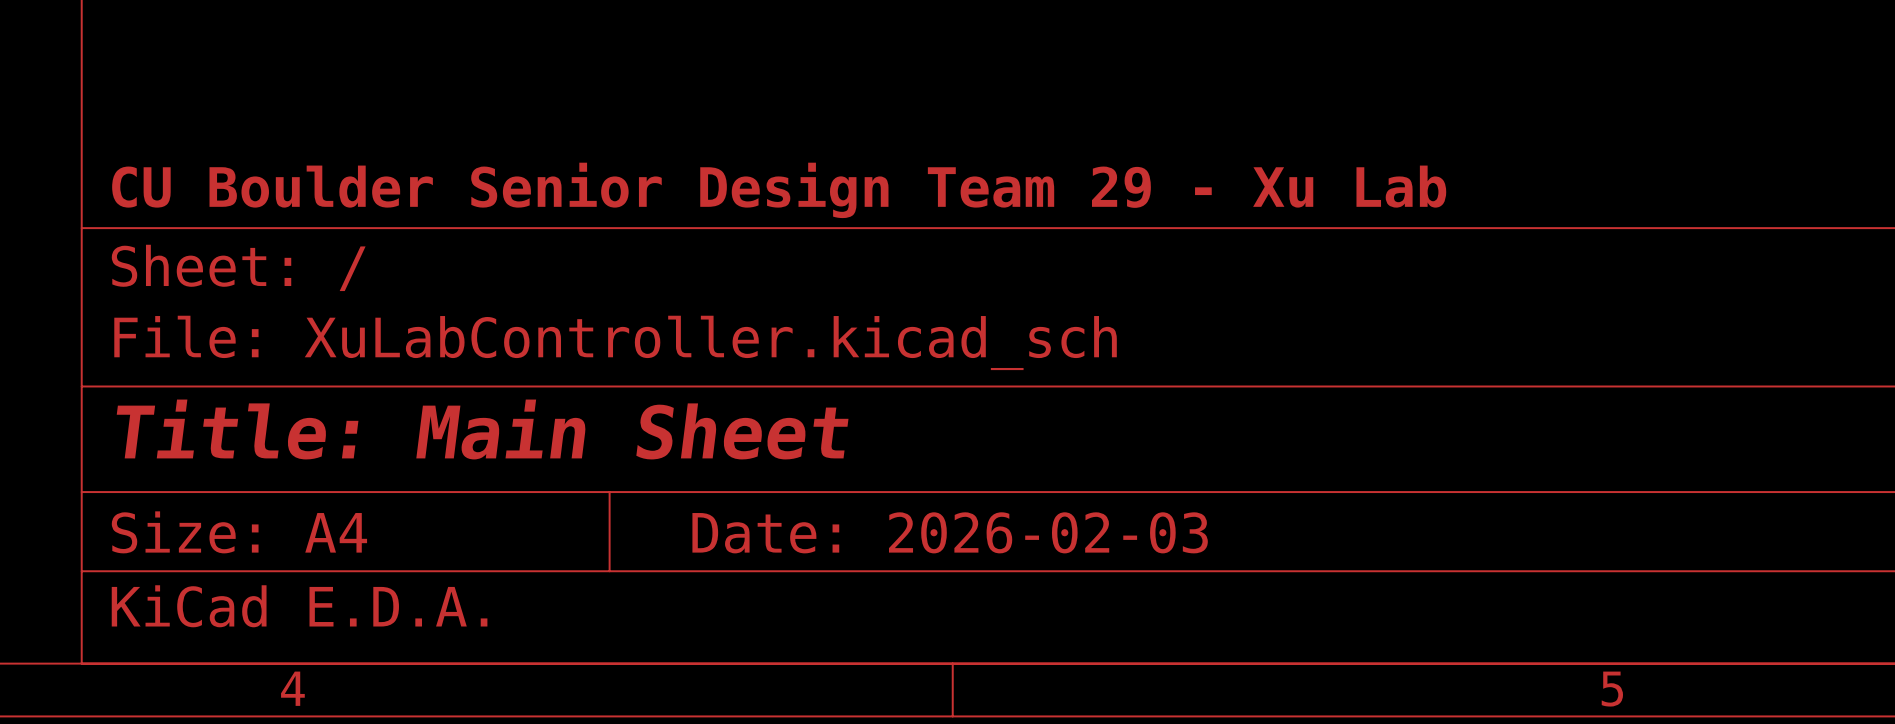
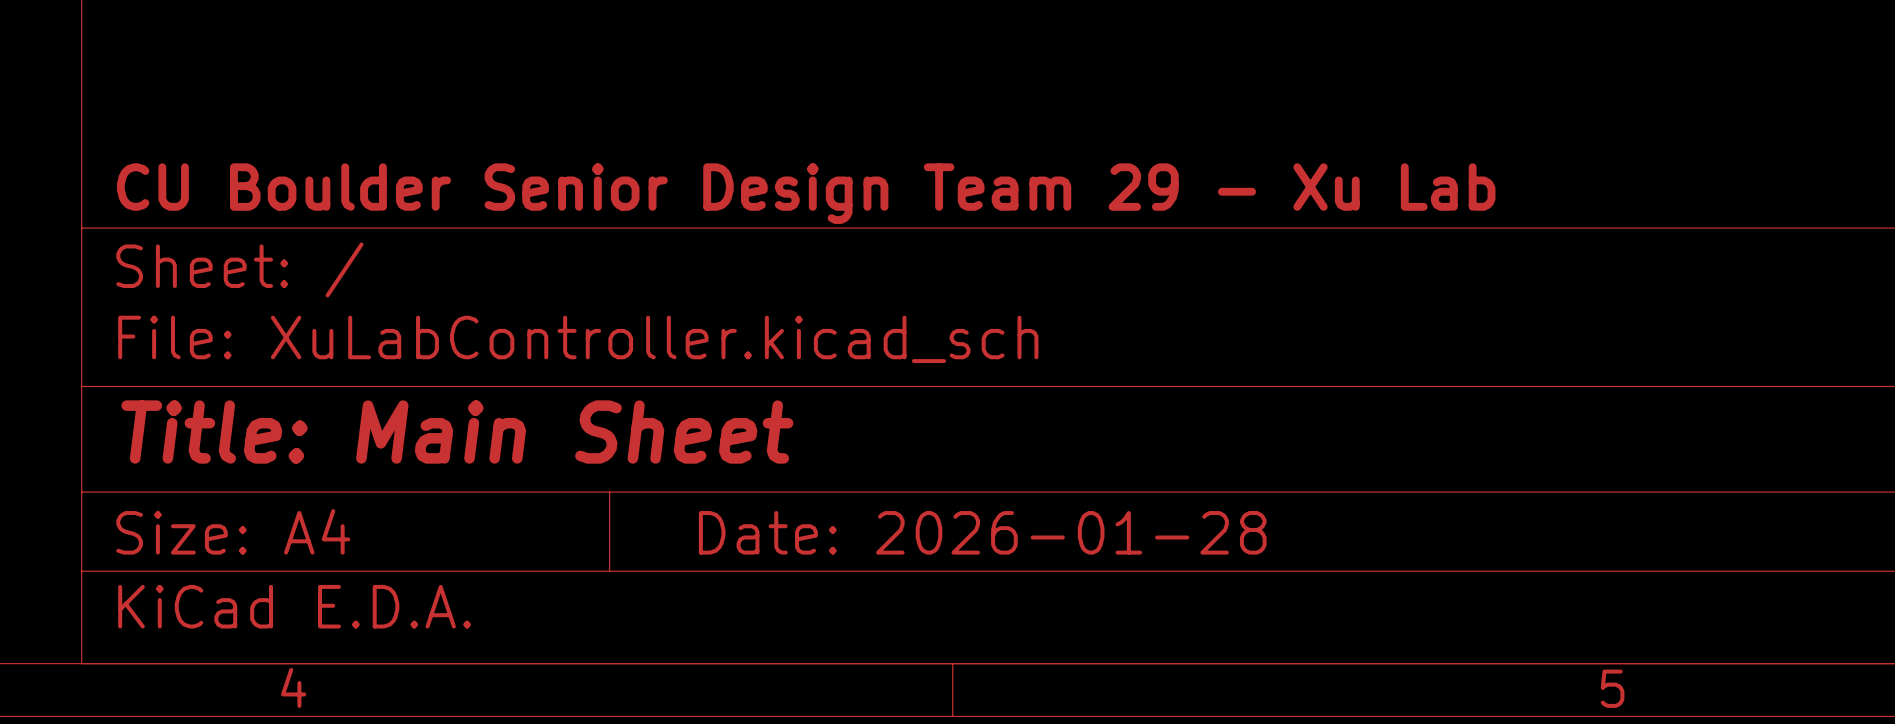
title block: Date: 2026-02-03 (950, 532) -> Date: 2026-01-28 (982, 532)

